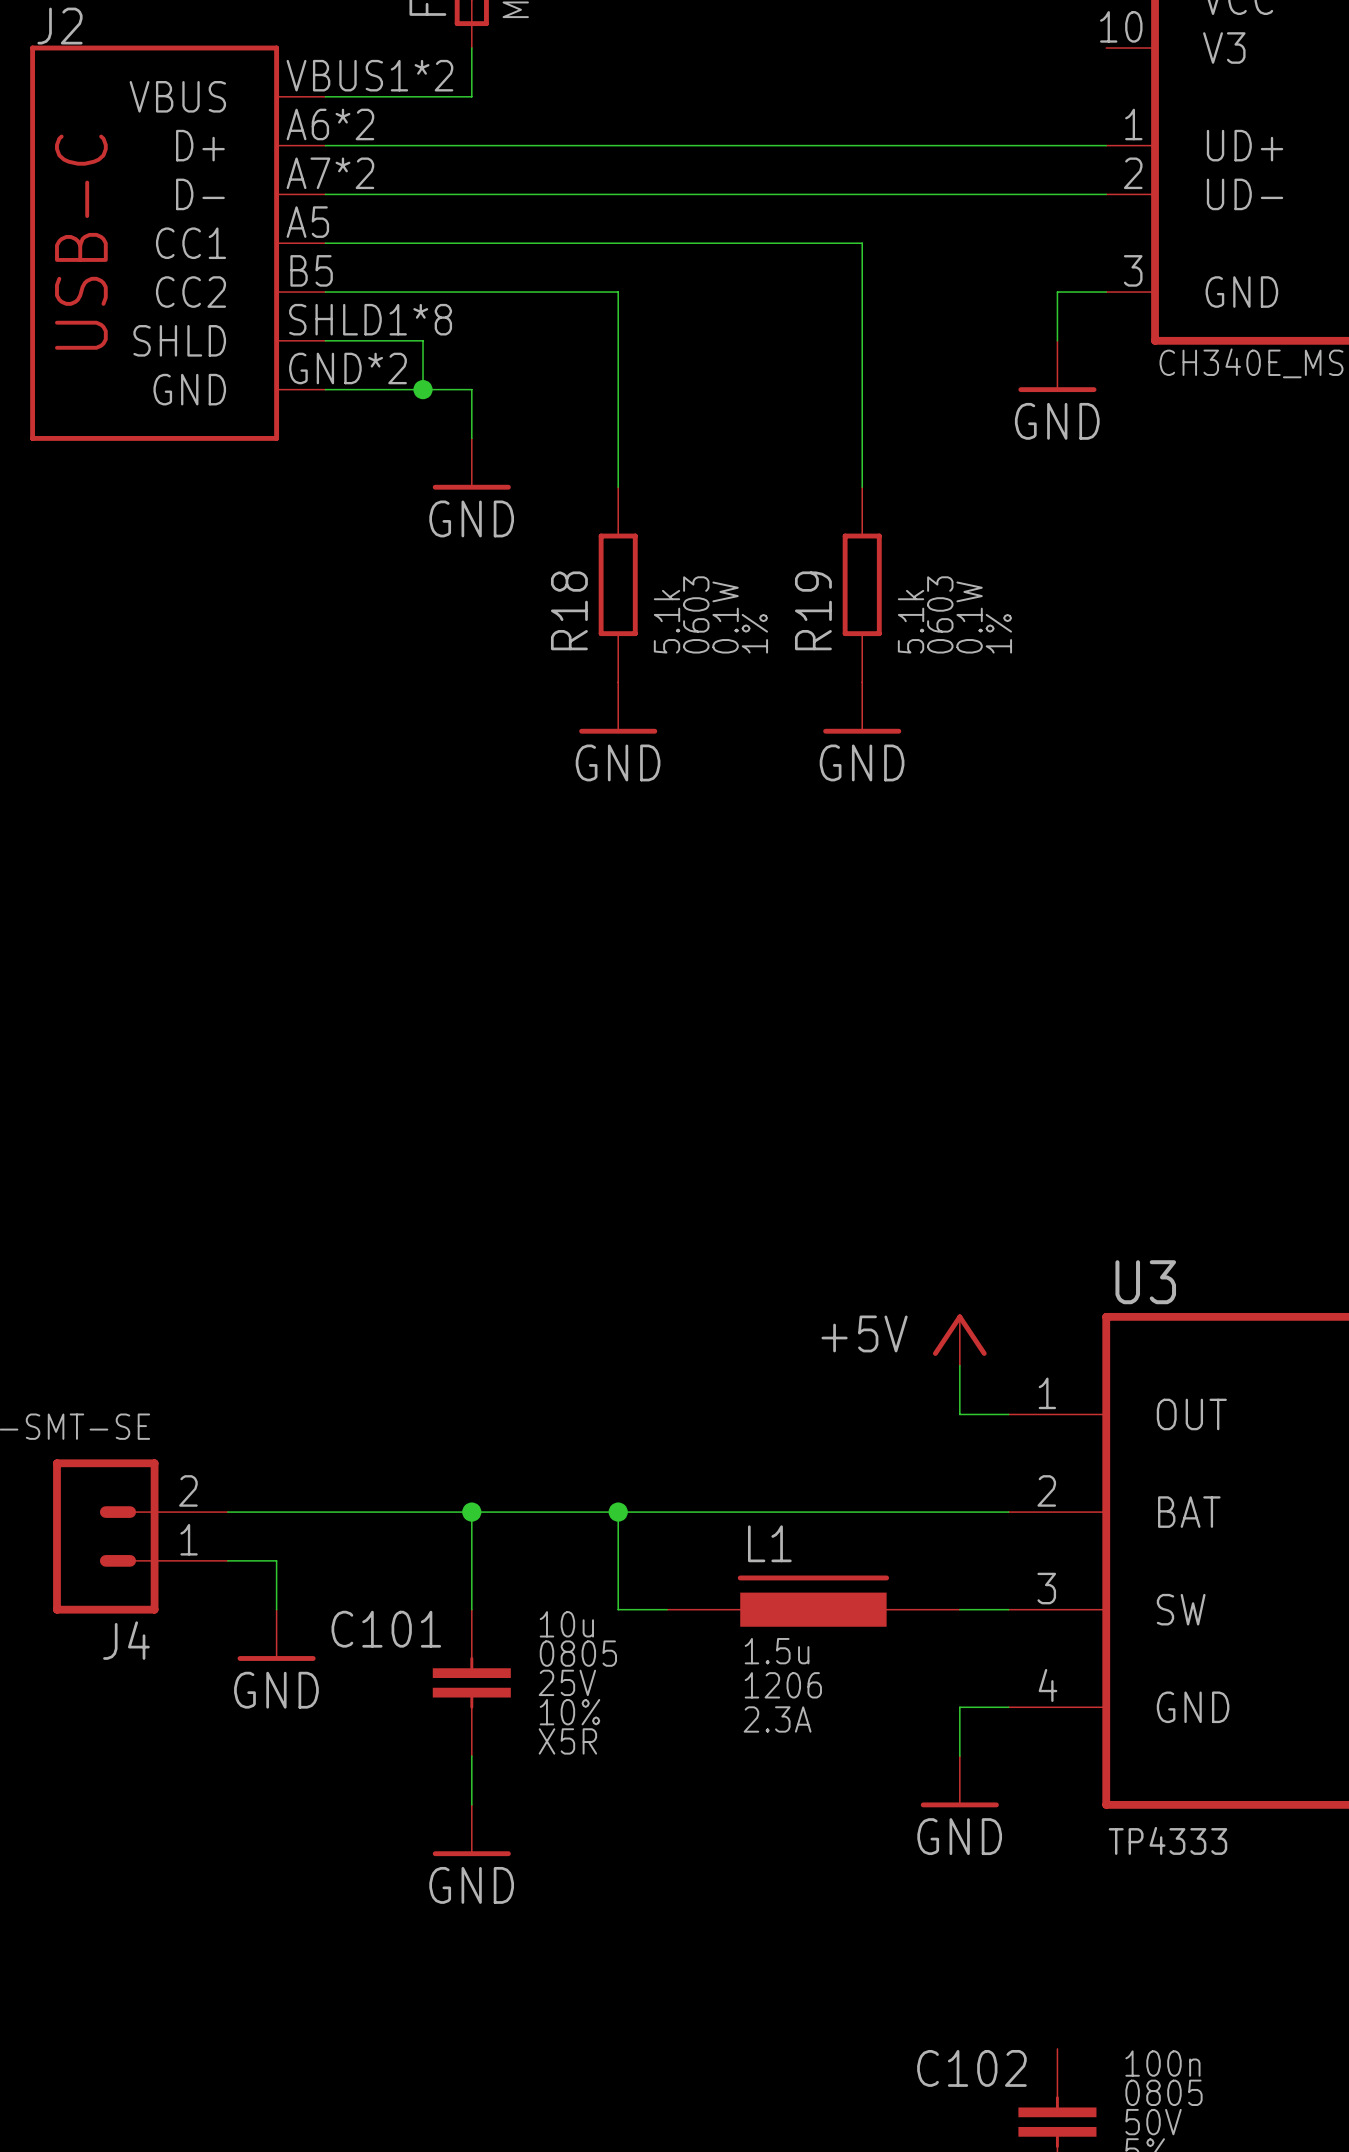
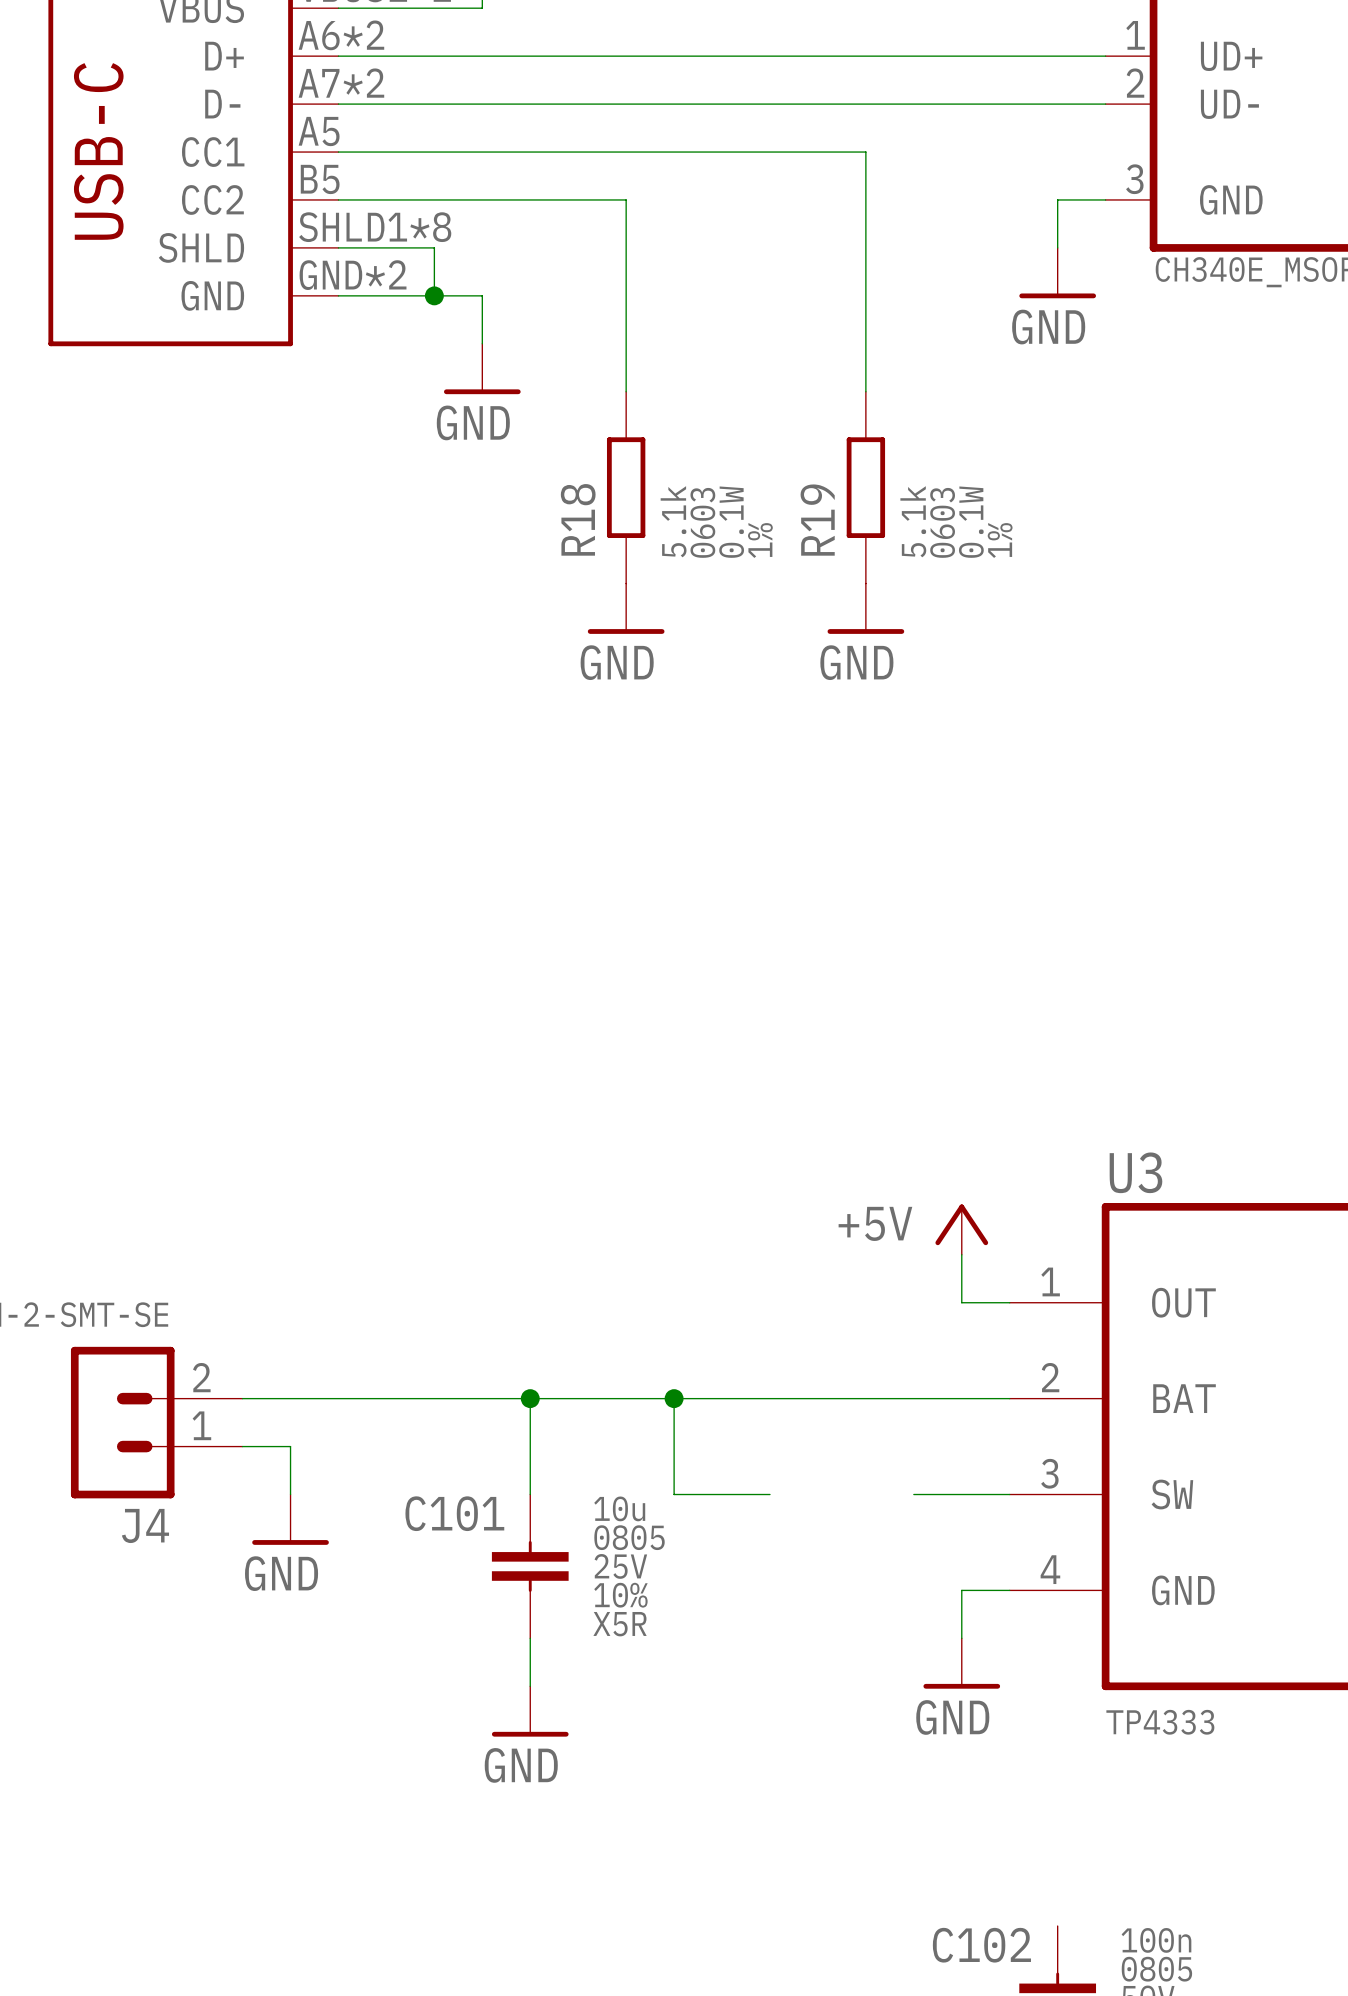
wire: (471, 1512) (471, 1609) -> (530, 1398) (530, 1494)
junction: (471, 1512) -> none
junction: none -> (530, 1398)
wire: (618, 1512) (618, 1609) (667, 1609) -> none
junction: (618, 1512) -> none
wire: none -> (674, 1398) (674, 1494) (769, 1494)
junction: none -> (674, 1398)
L1: 1.5u (813, 1601) -> none
C101 position: (471, 1682) -> (530, 1566)
wire: (471, 1756) (471, 1804) -> (530, 1638) (530, 1686)
power symbol position: GND (471, 1830) -> GND (530, 1711)

